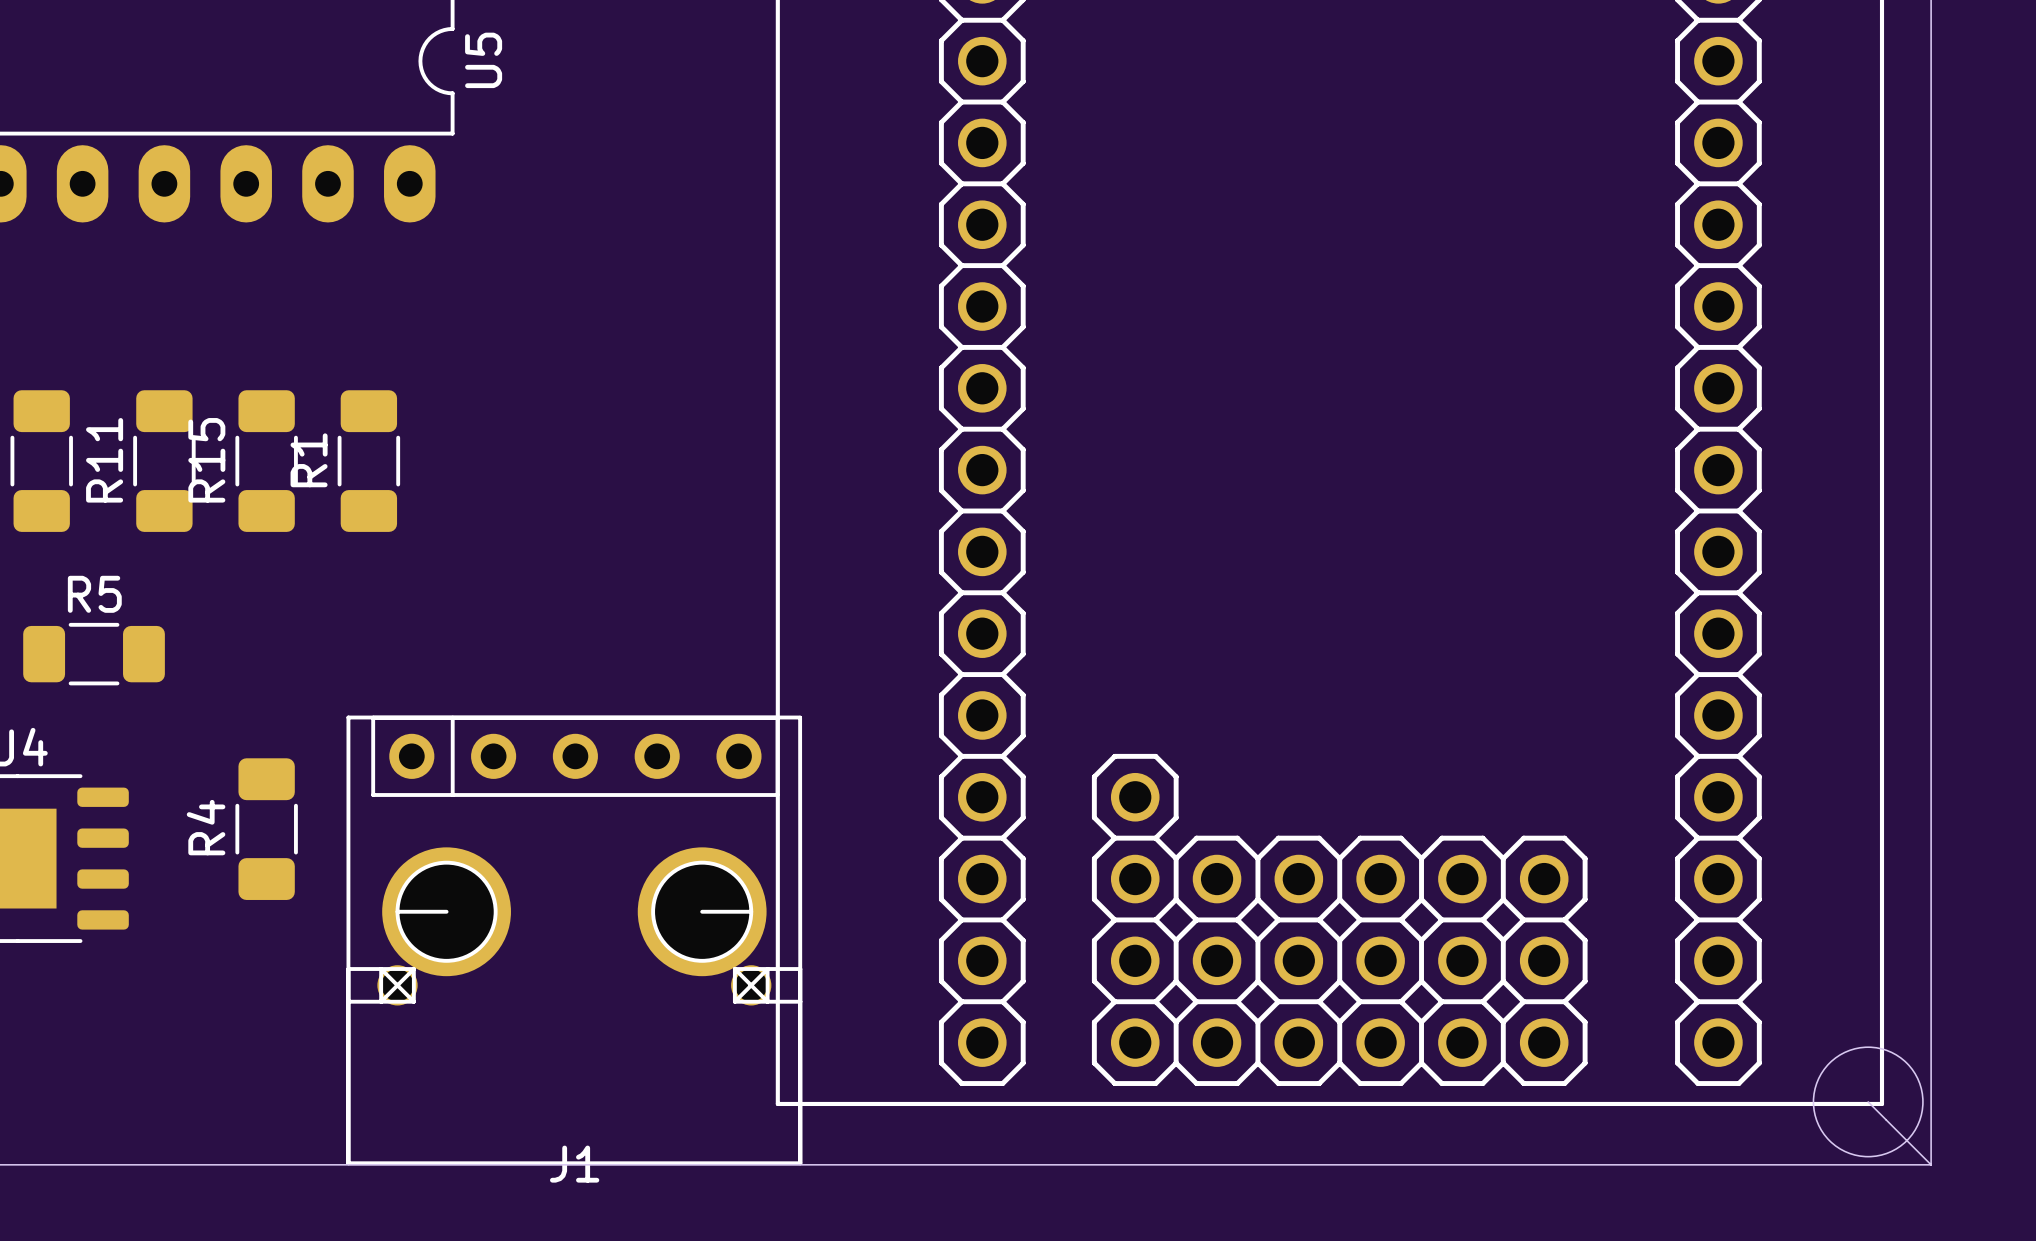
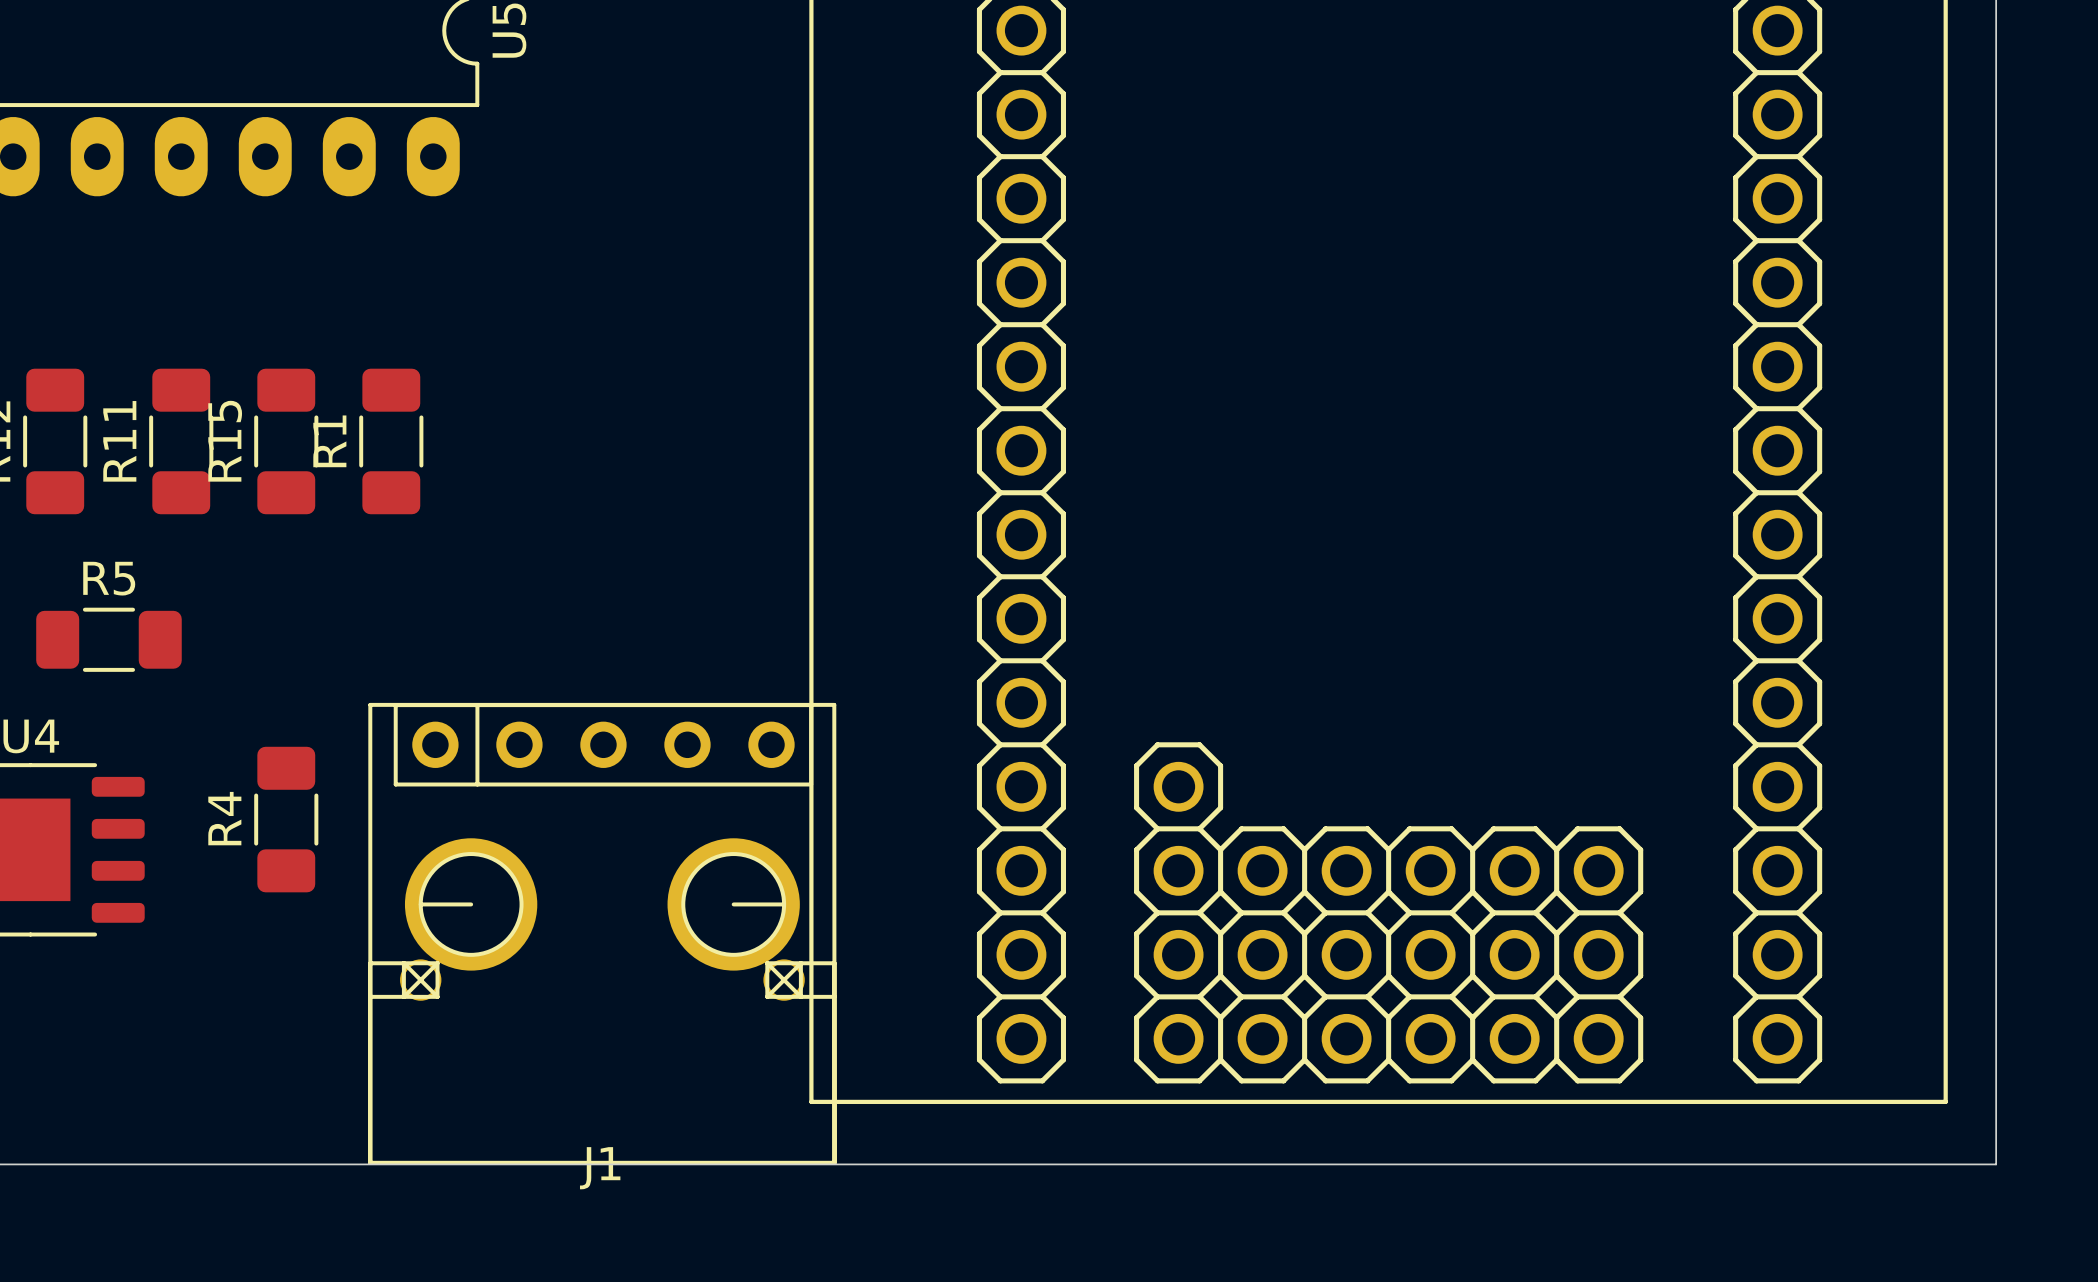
round board edge: [1812, 1046, 1924, 1158] -> none
board edge: (1868, 1101) (1931, 1164) -> none

